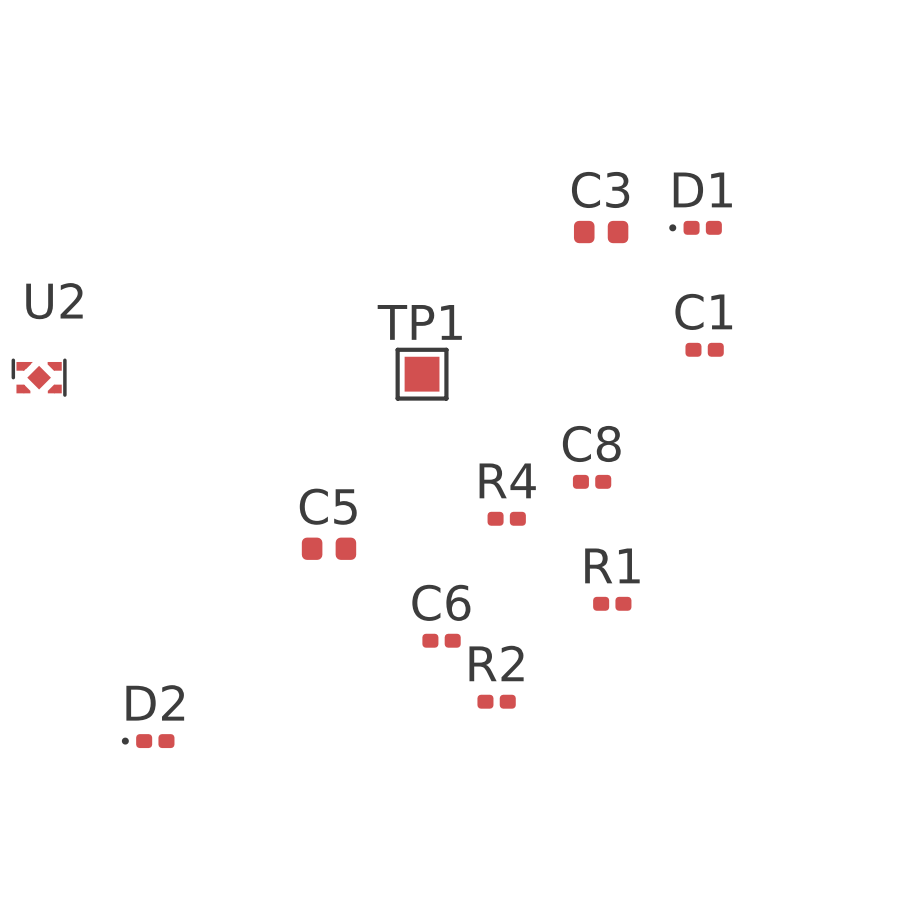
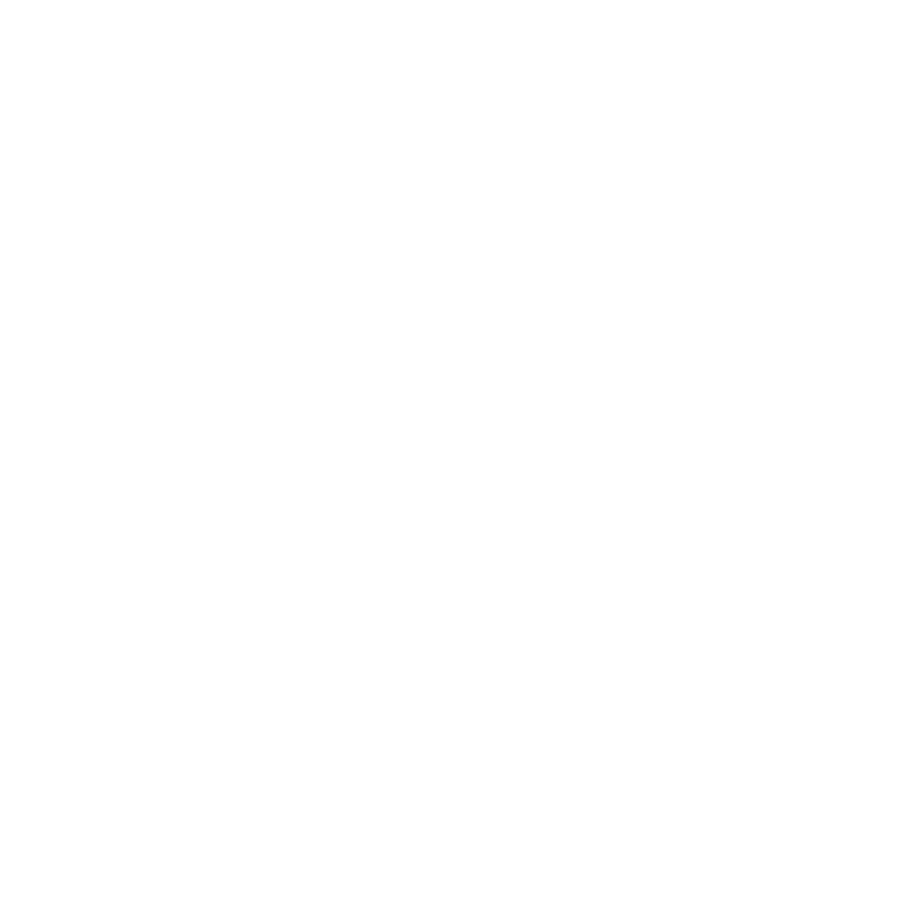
D1: (695, 227) -> none
C3: (601, 232) -> none
C1: (704, 349) -> none
TP1: (422, 374) -> none
U2: (39, 377) -> none
C8: (592, 481) -> none
R4: (506, 518) -> none
C5: (329, 548) -> none
R1: (612, 603) -> none
C6: (441, 640) -> none
R2: (496, 701) -> none
D2: (148, 741) -> none

